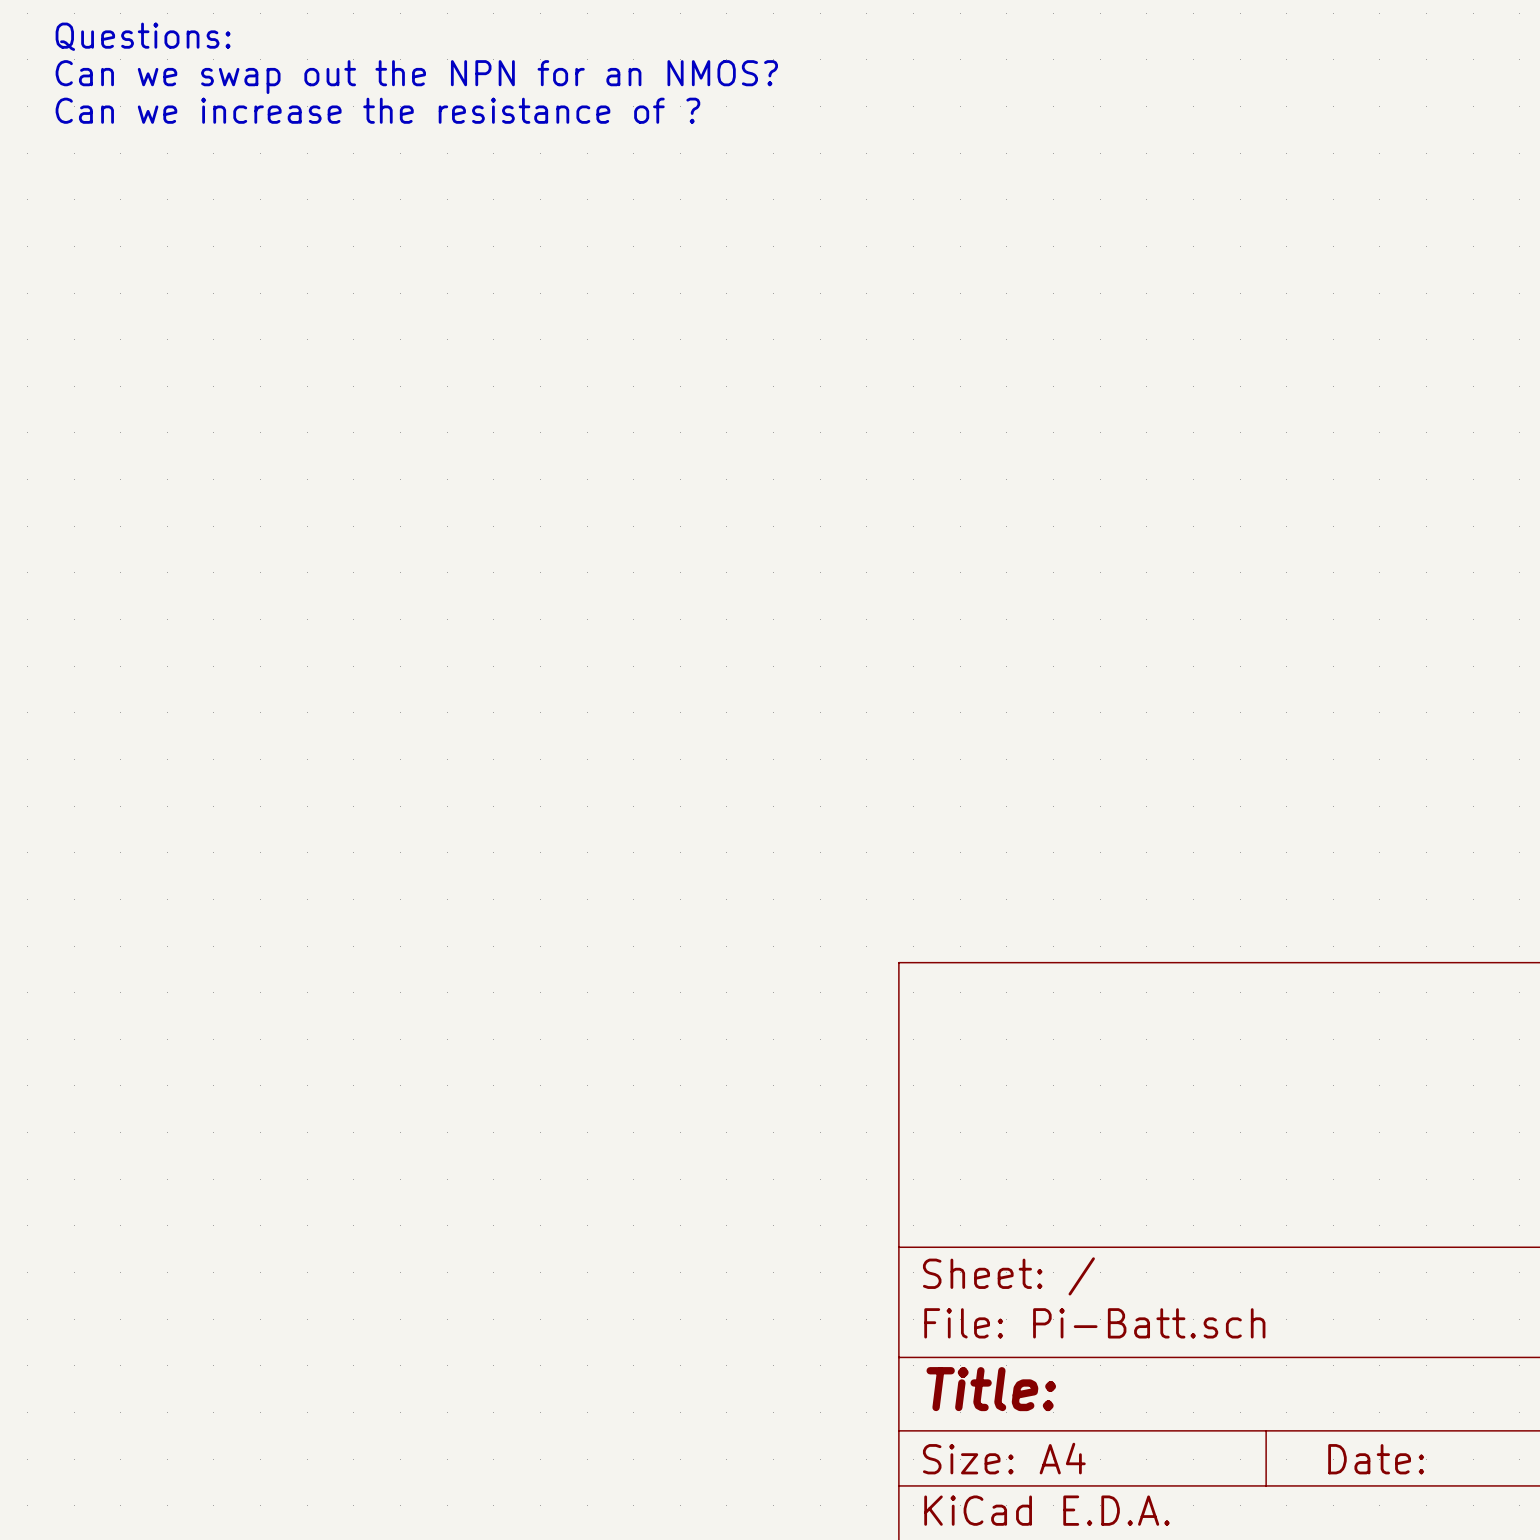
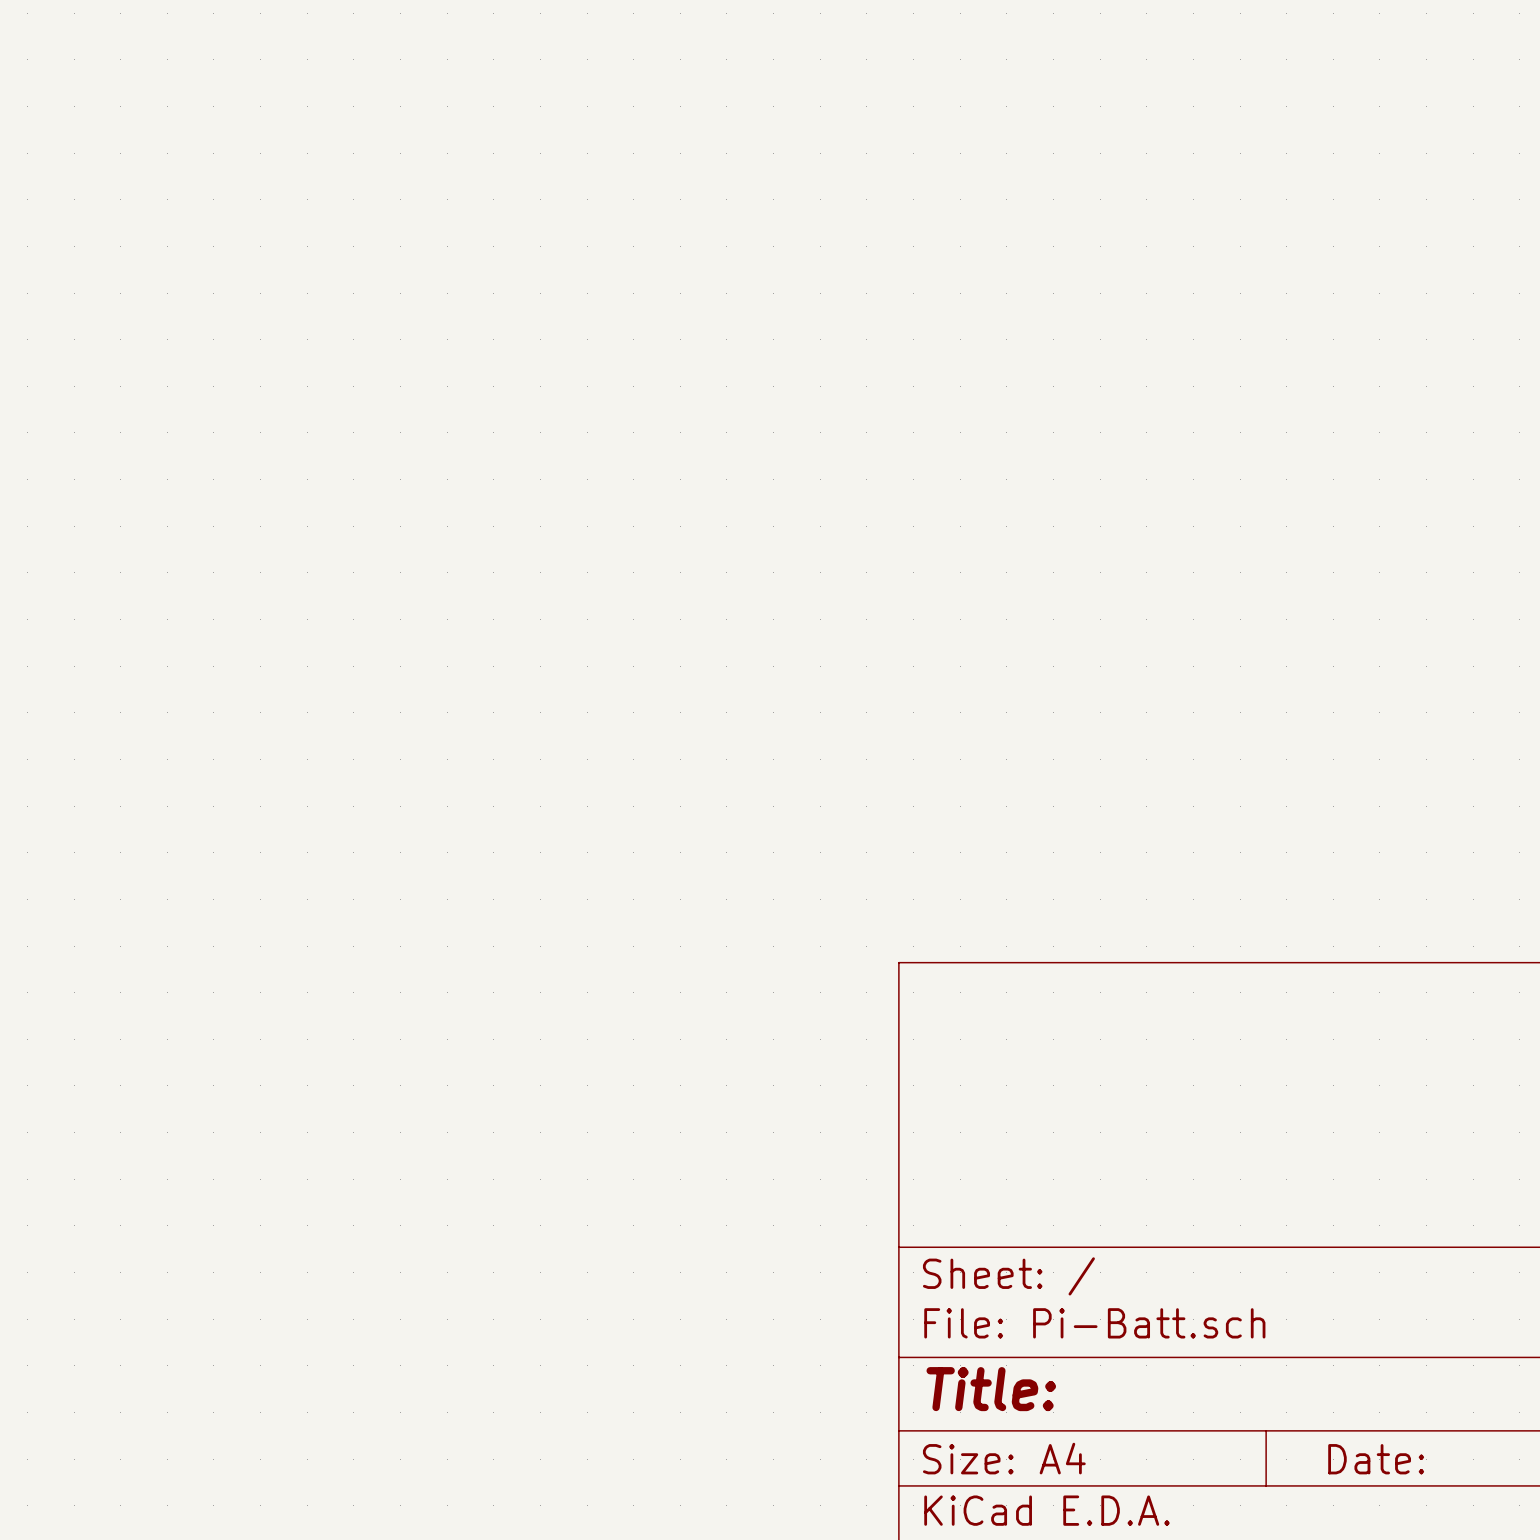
text: Questions: (143, 36) -> none
text: Can we swap out the NPN for an NMOS? (416, 77) -> none
text: Can we increase the resistance of ? (377, 110) -> none

